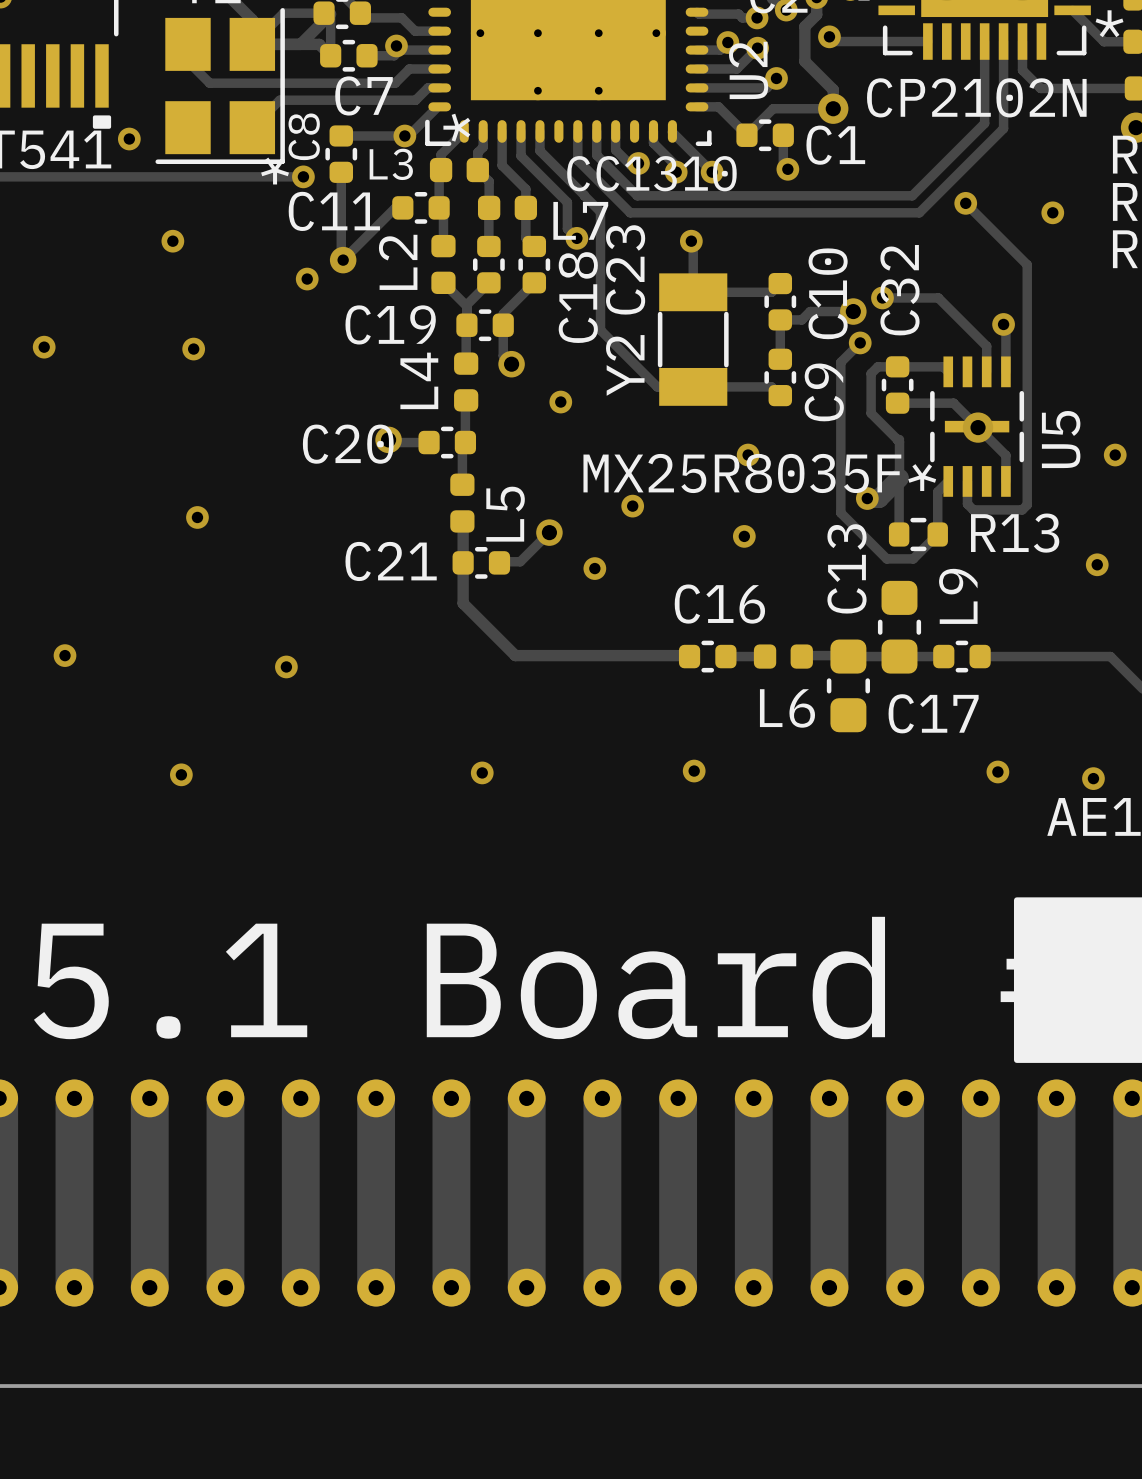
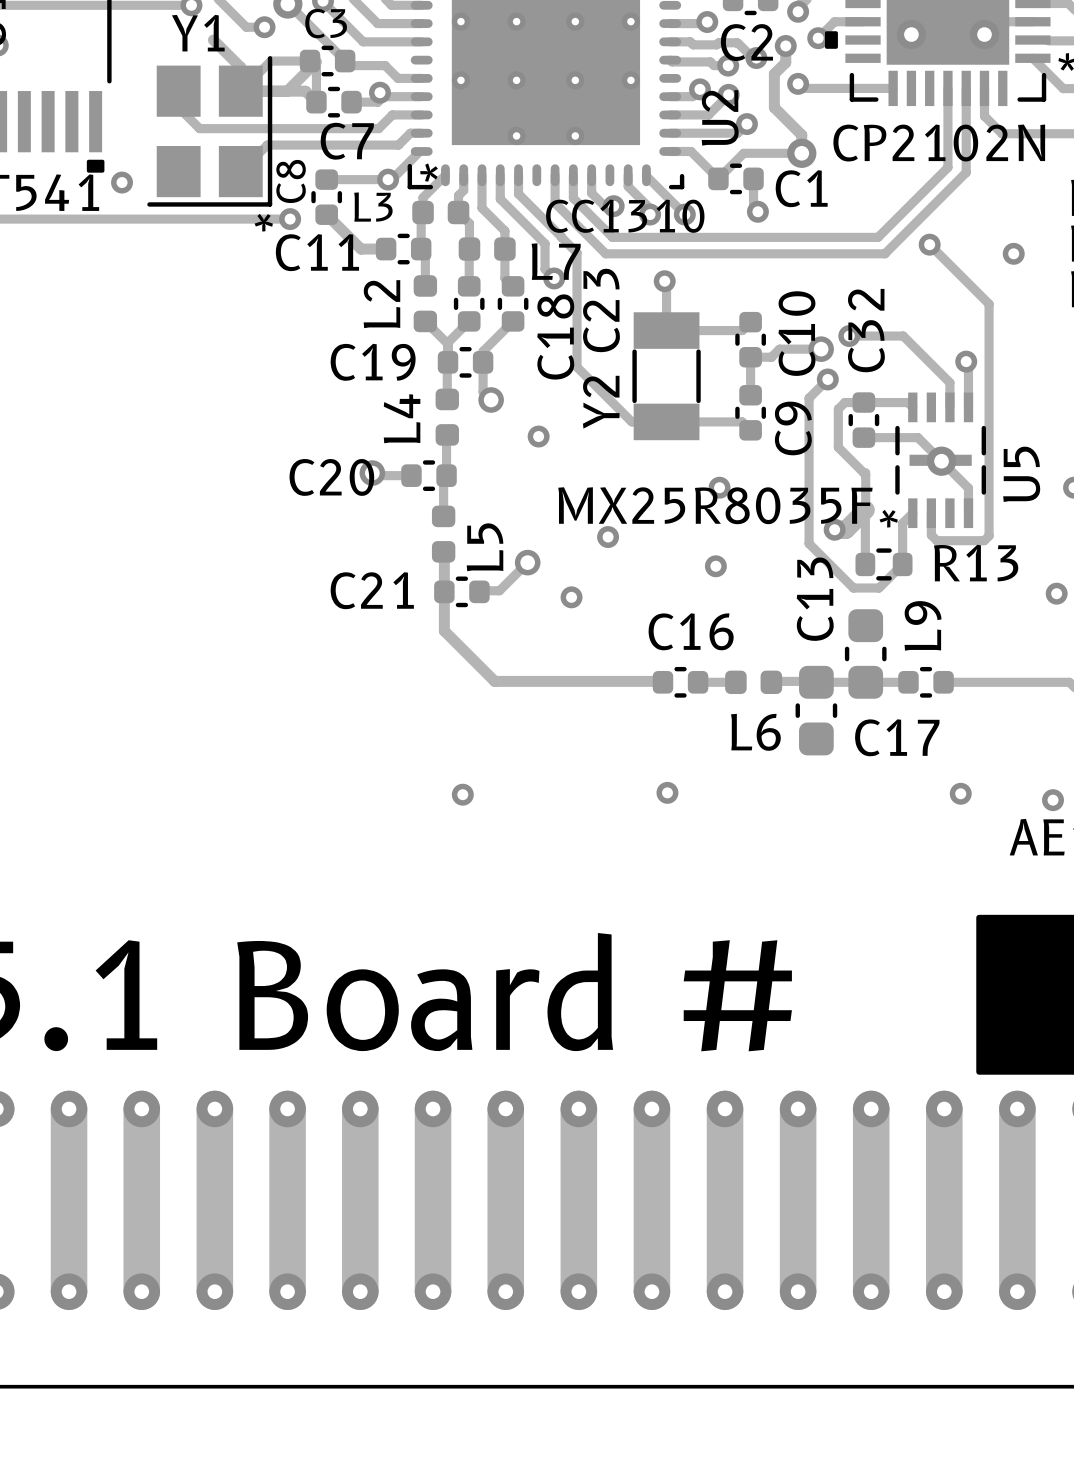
track: (341, 172) (341, 258) (343, 260) (395, 207) -> (326, 214) (361, 249) (378, 249)
via: (172, 241) -> none
via: (343, 260) -> none
via: (307, 279) -> none
via: (44, 347) -> none
via: (193, 349) -> none
via: (197, 517) -> none
via: (65, 655) -> none
via: (286, 666) -> none
via: (181, 774) -> none

